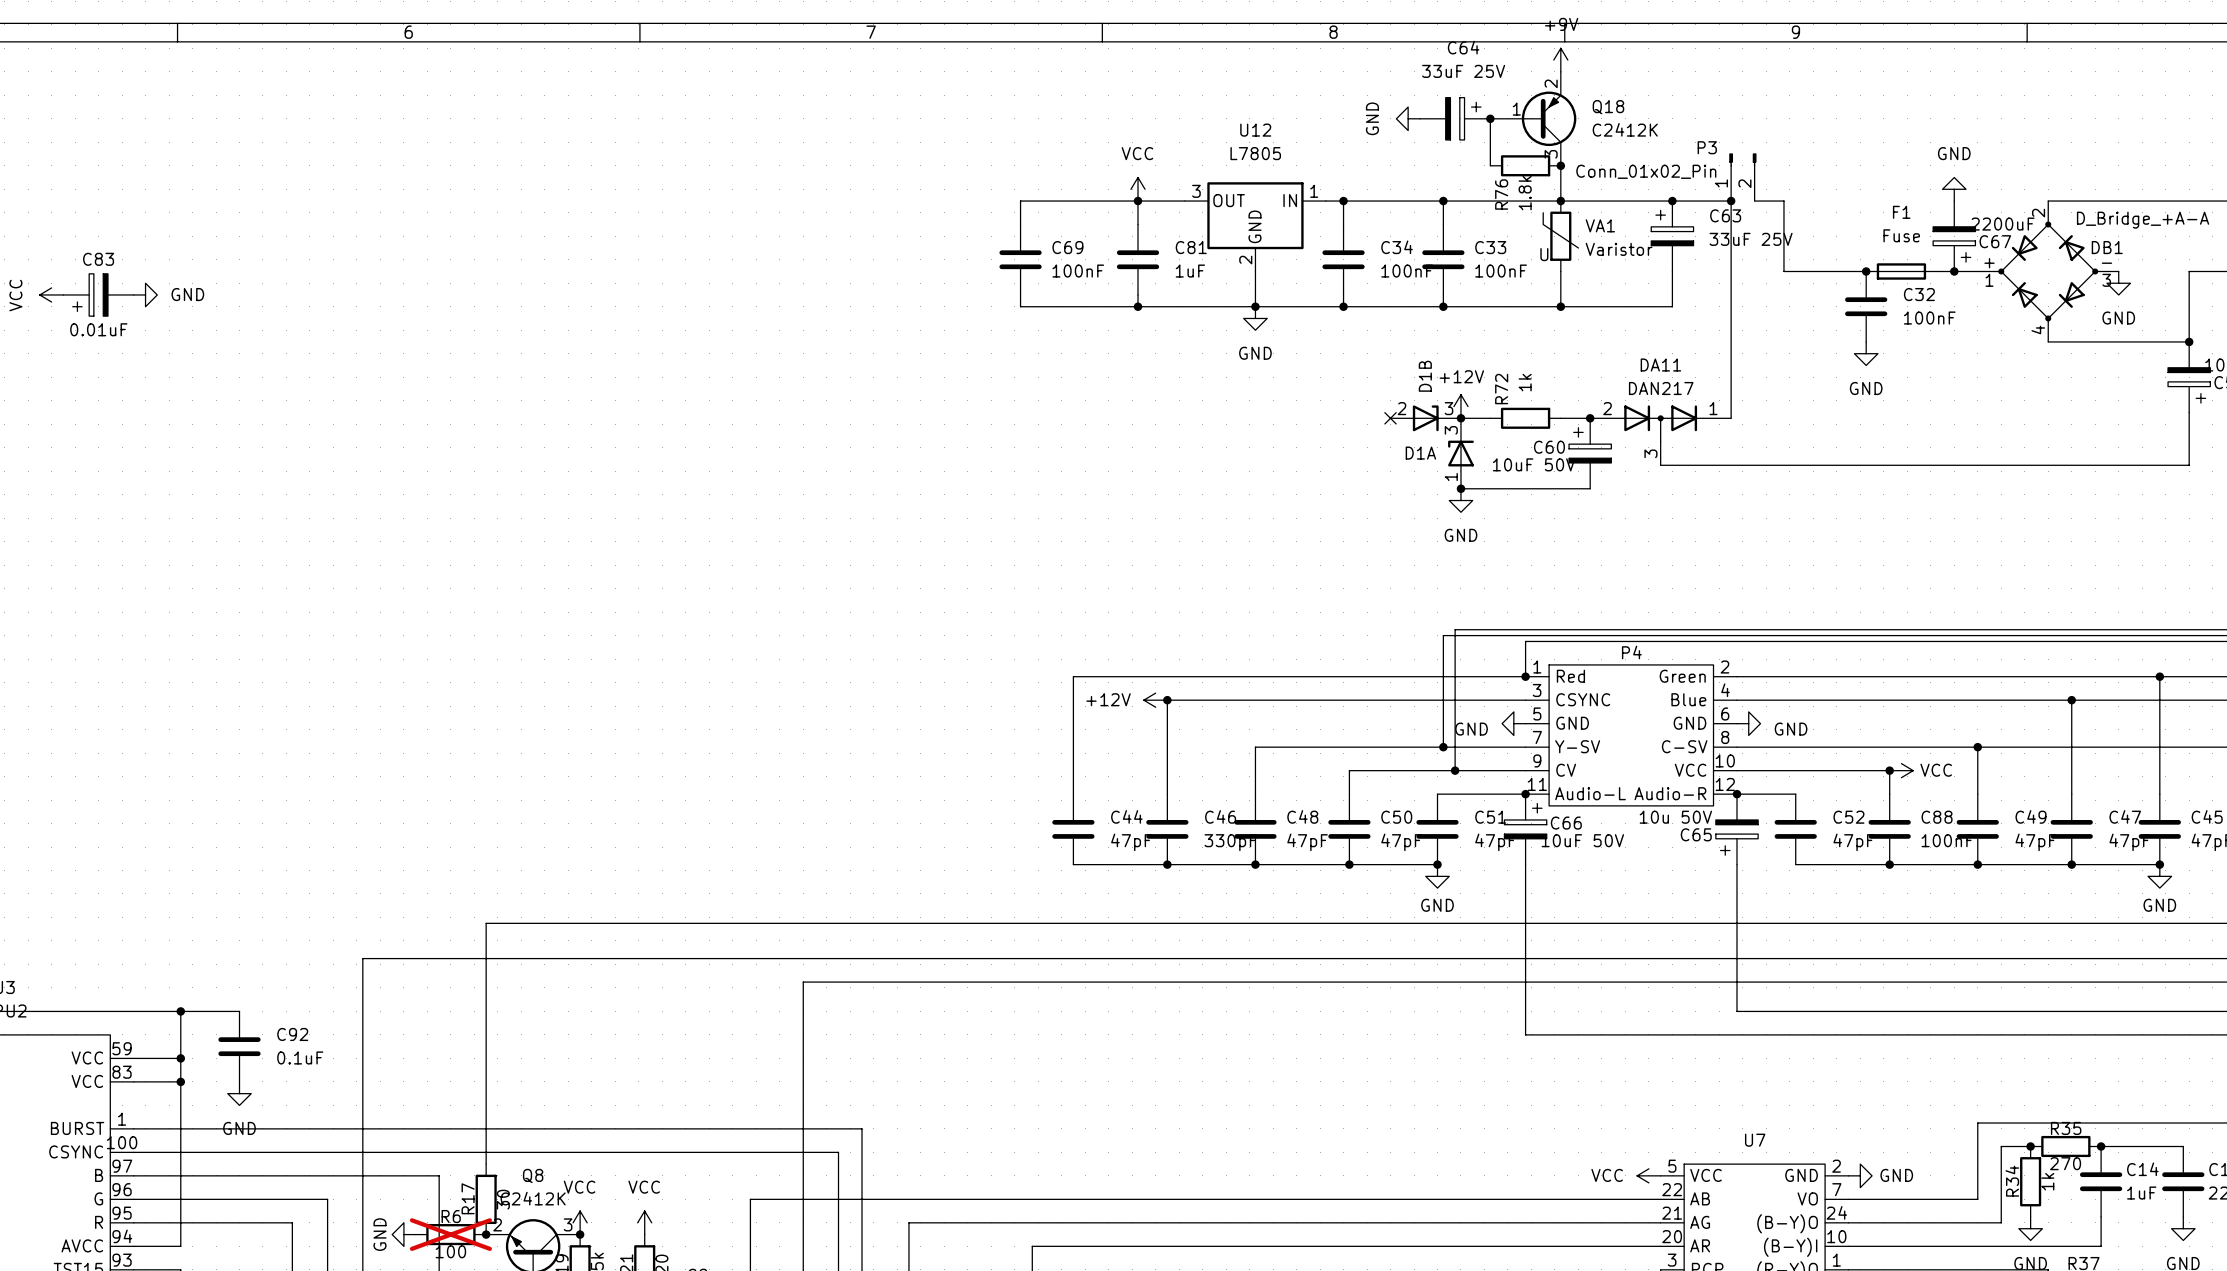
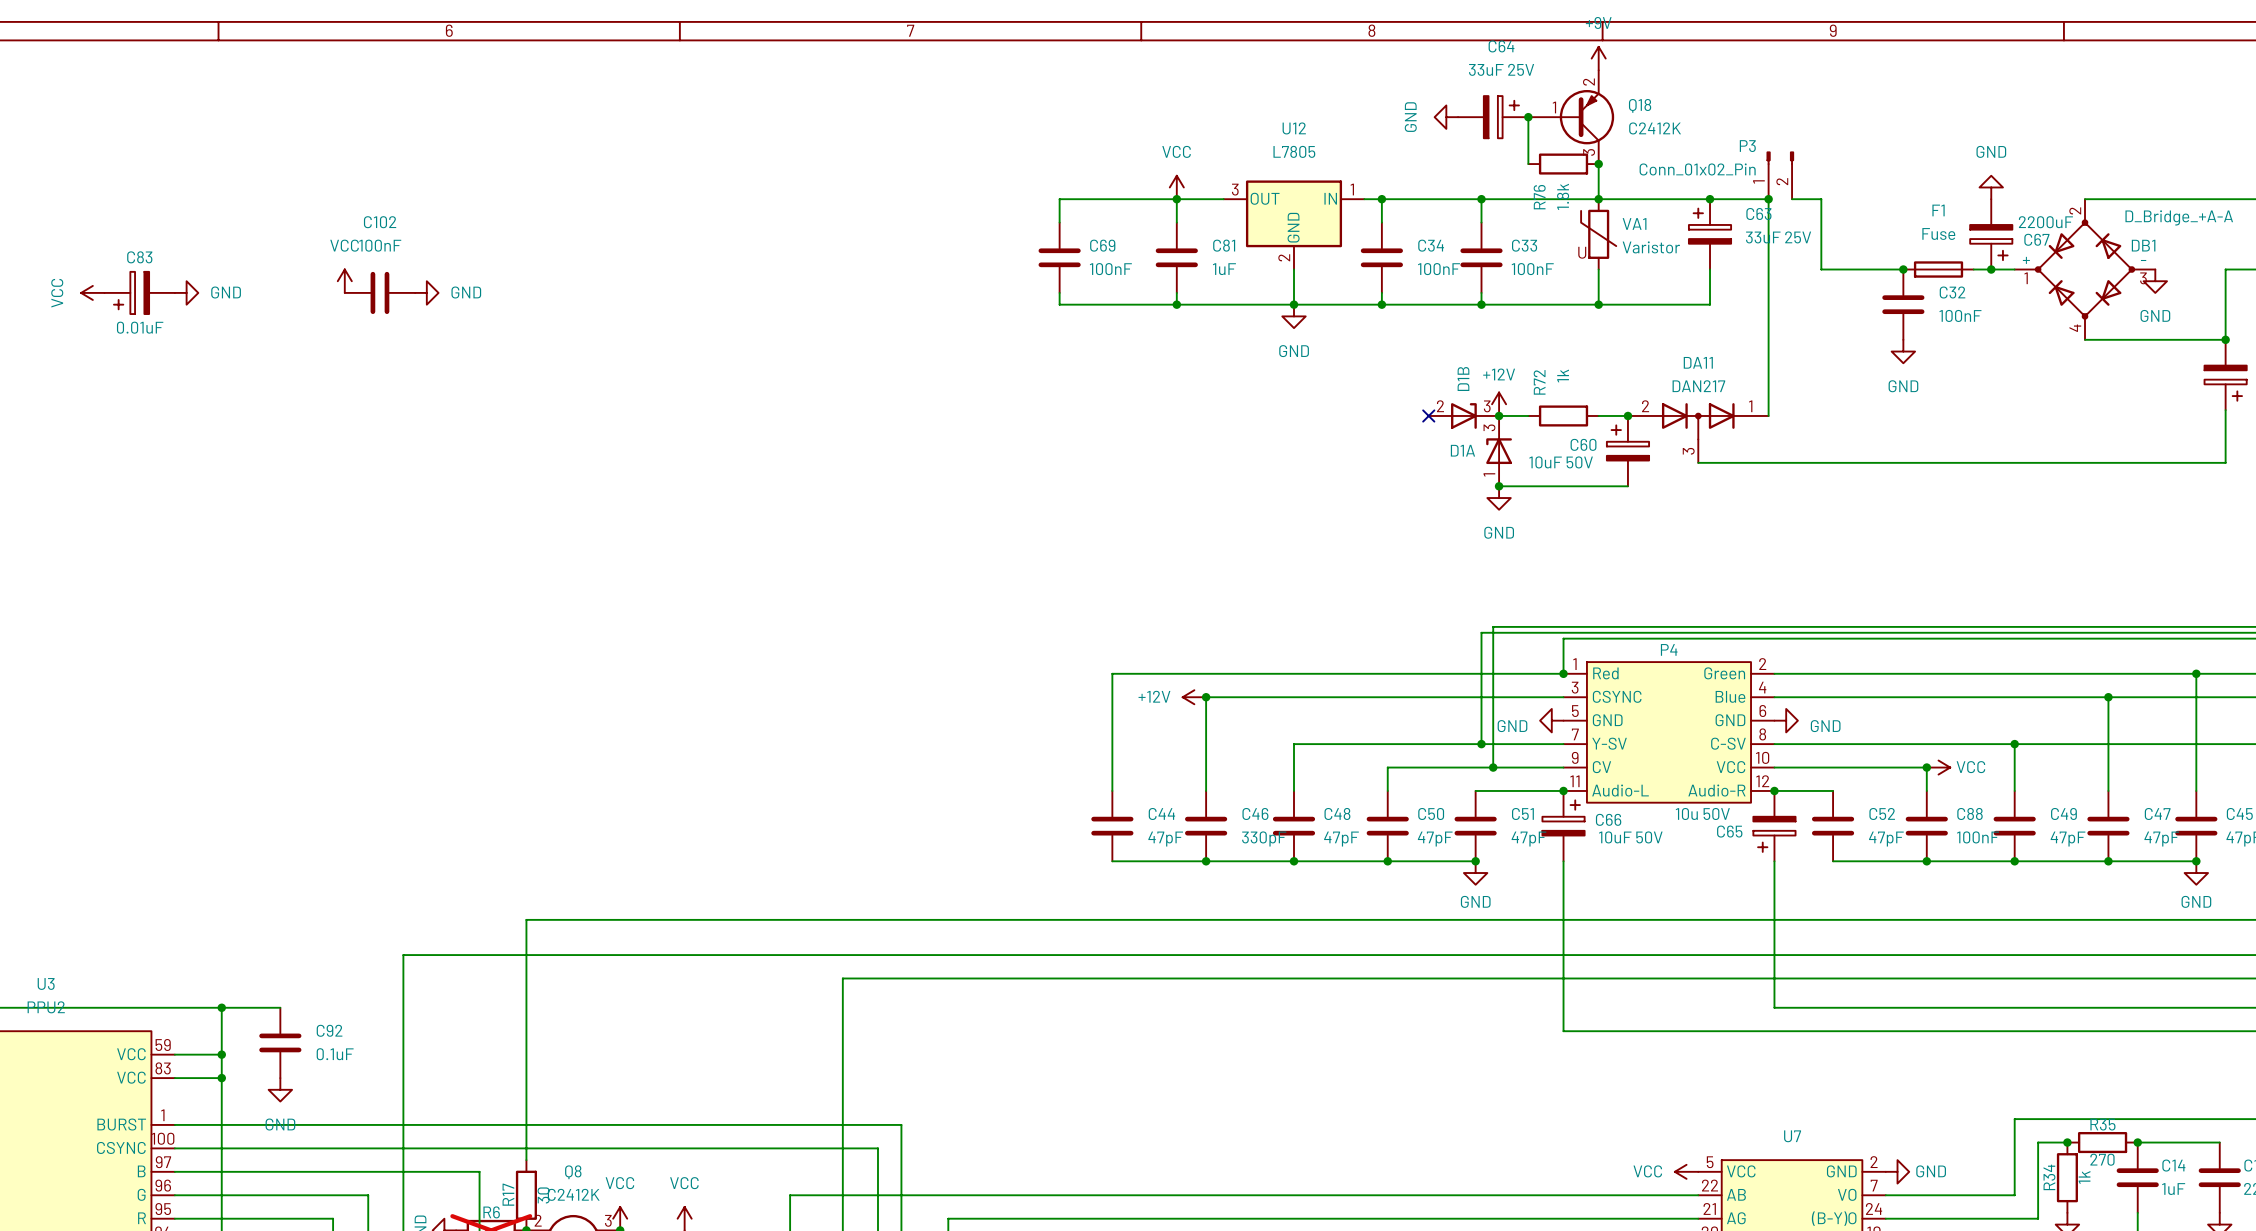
power symbol: none -> VCC (344, 281)
C102: none -> 100nF (379, 292)
power symbol: none -> GND (426, 292)

